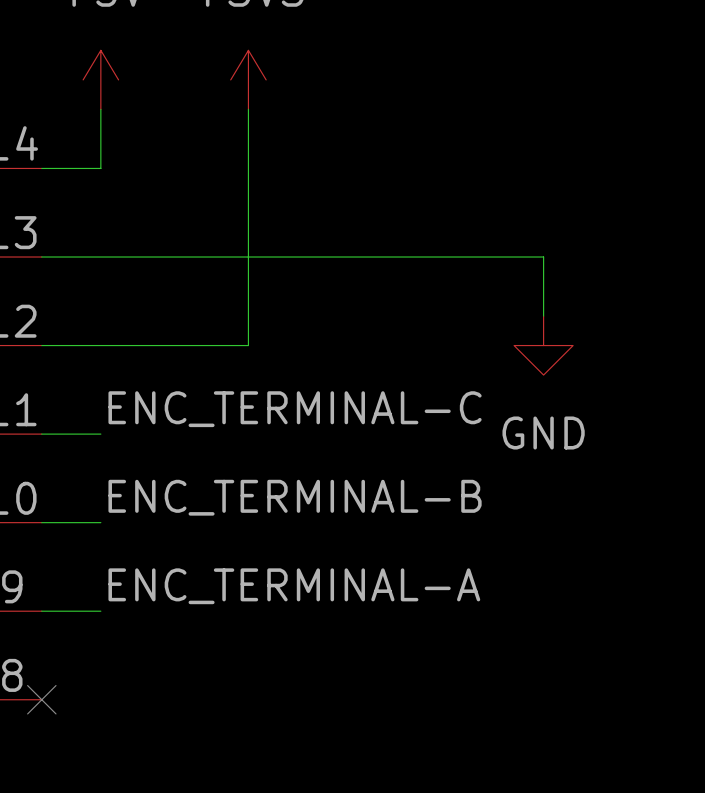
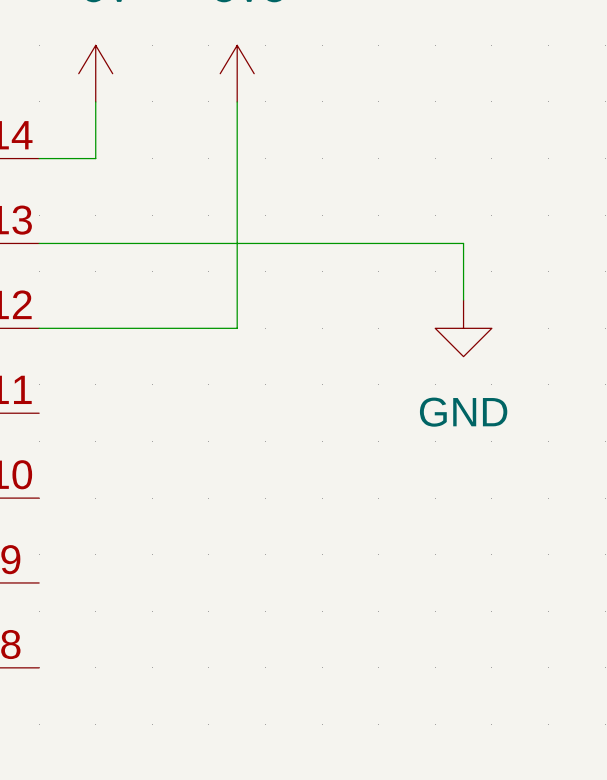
wire: (484, 257) (543, 257) (543, 316) -> (463, 243) (463, 300)
power symbol position: GND (543, 345) -> GND (463, 328)
label: ENC_TERMINAL-C (295, 409) -> none
wire: (41, 434) (100, 434) -> none
label: ENC_TERMINAL-B (295, 497) -> none
wire: (41, 522) (100, 522) -> none
label: ENC_TERMINAL-A (294, 586) -> none
wire: (41, 611) (100, 611) -> none
no-connect mark: (41, 699) -> none

